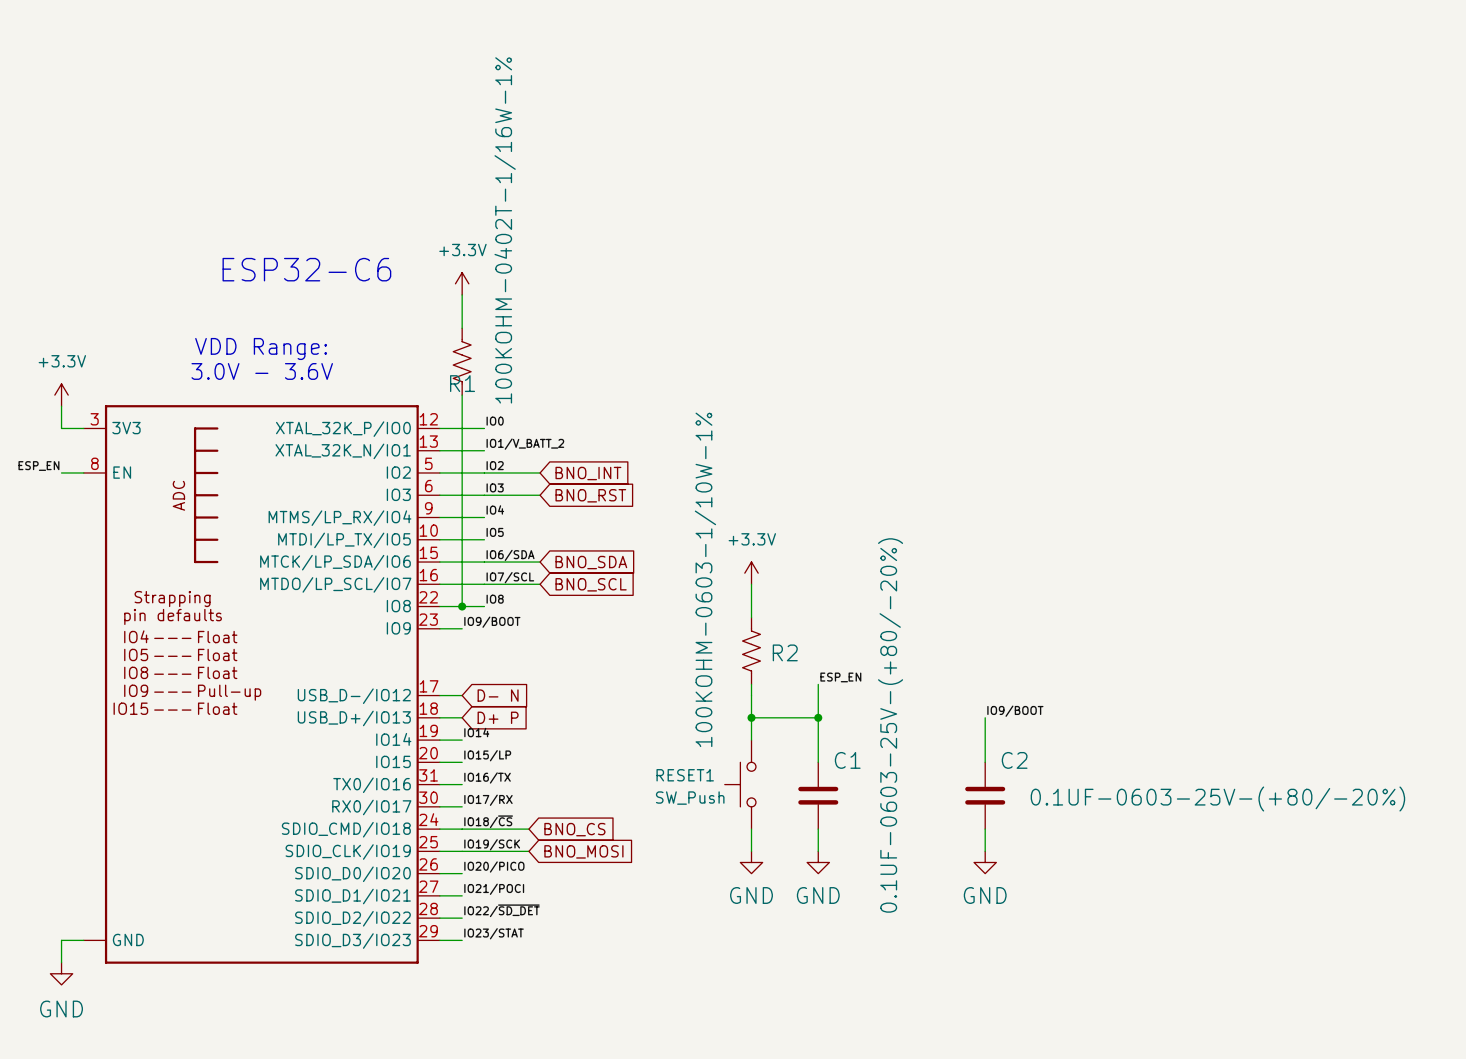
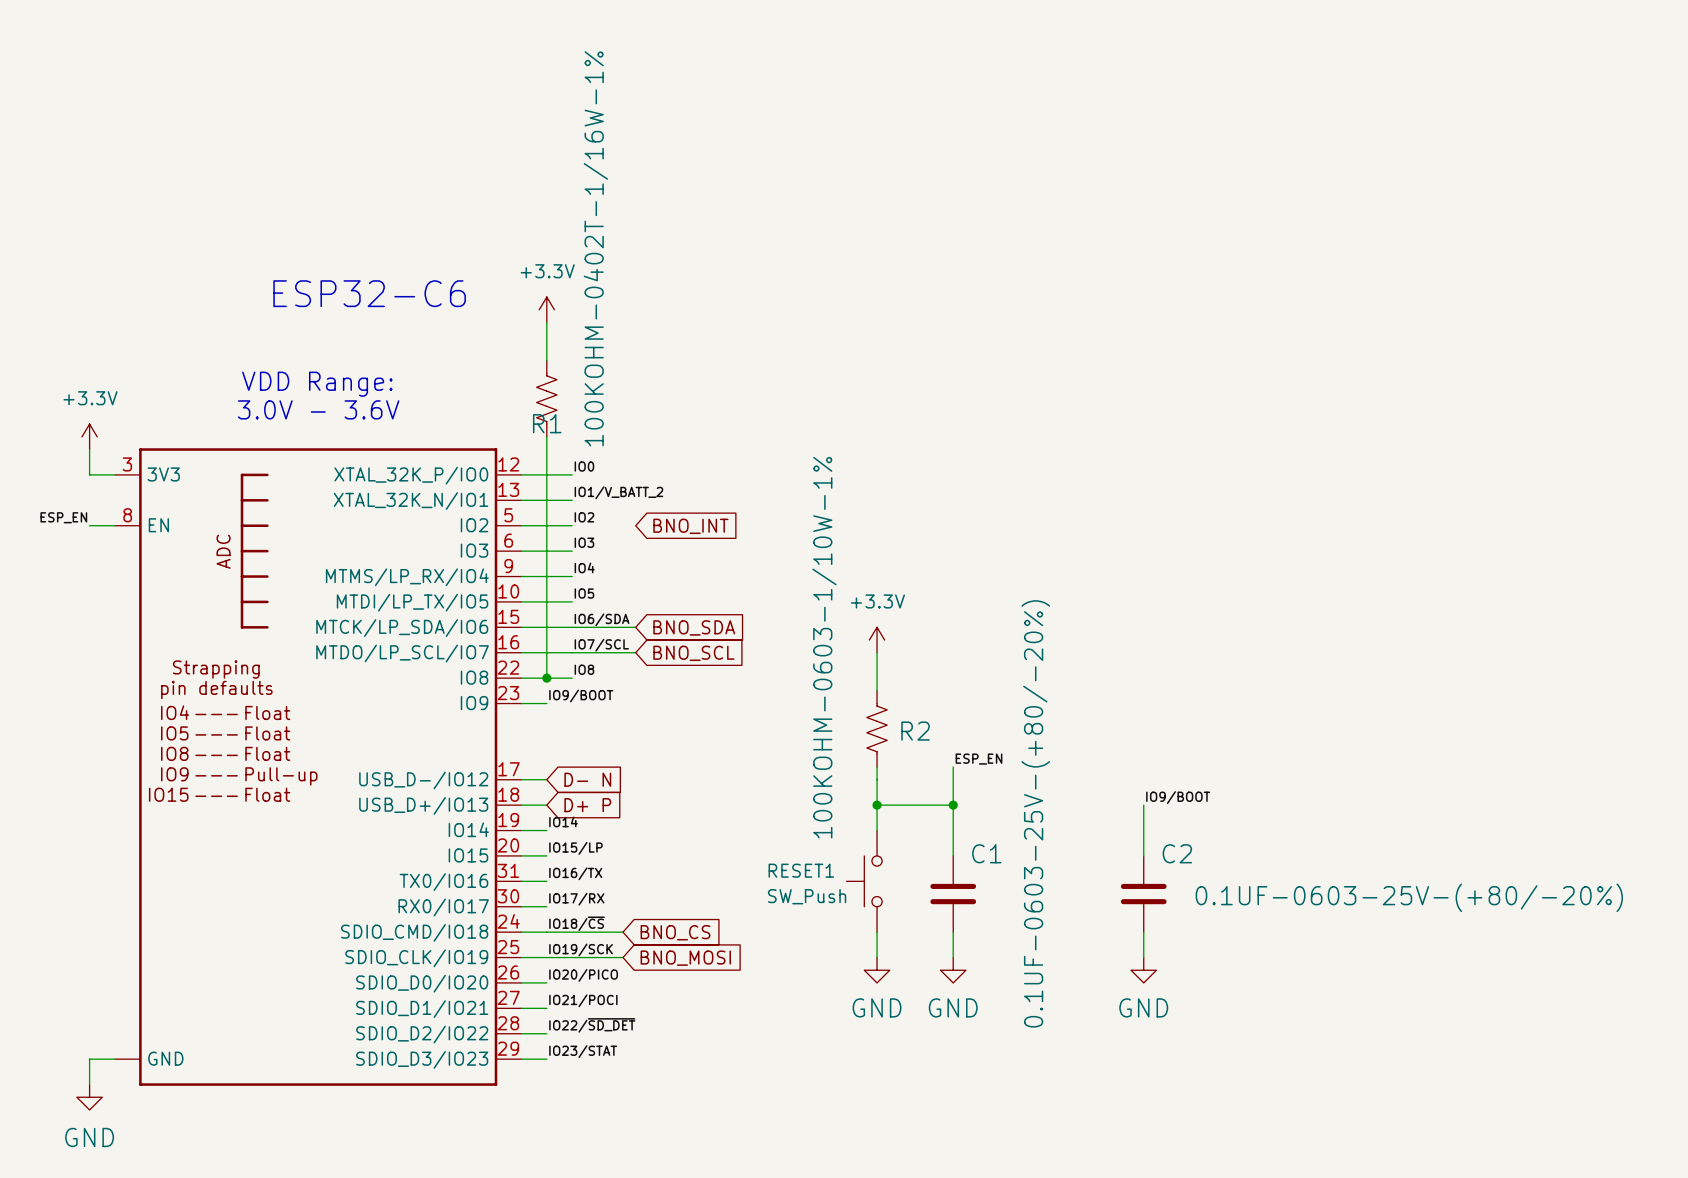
wire: (484, 472) (540, 472) -> none
wire: (484, 495) (540, 495) -> none
global label: BNO_RST (590, 495) -> none

